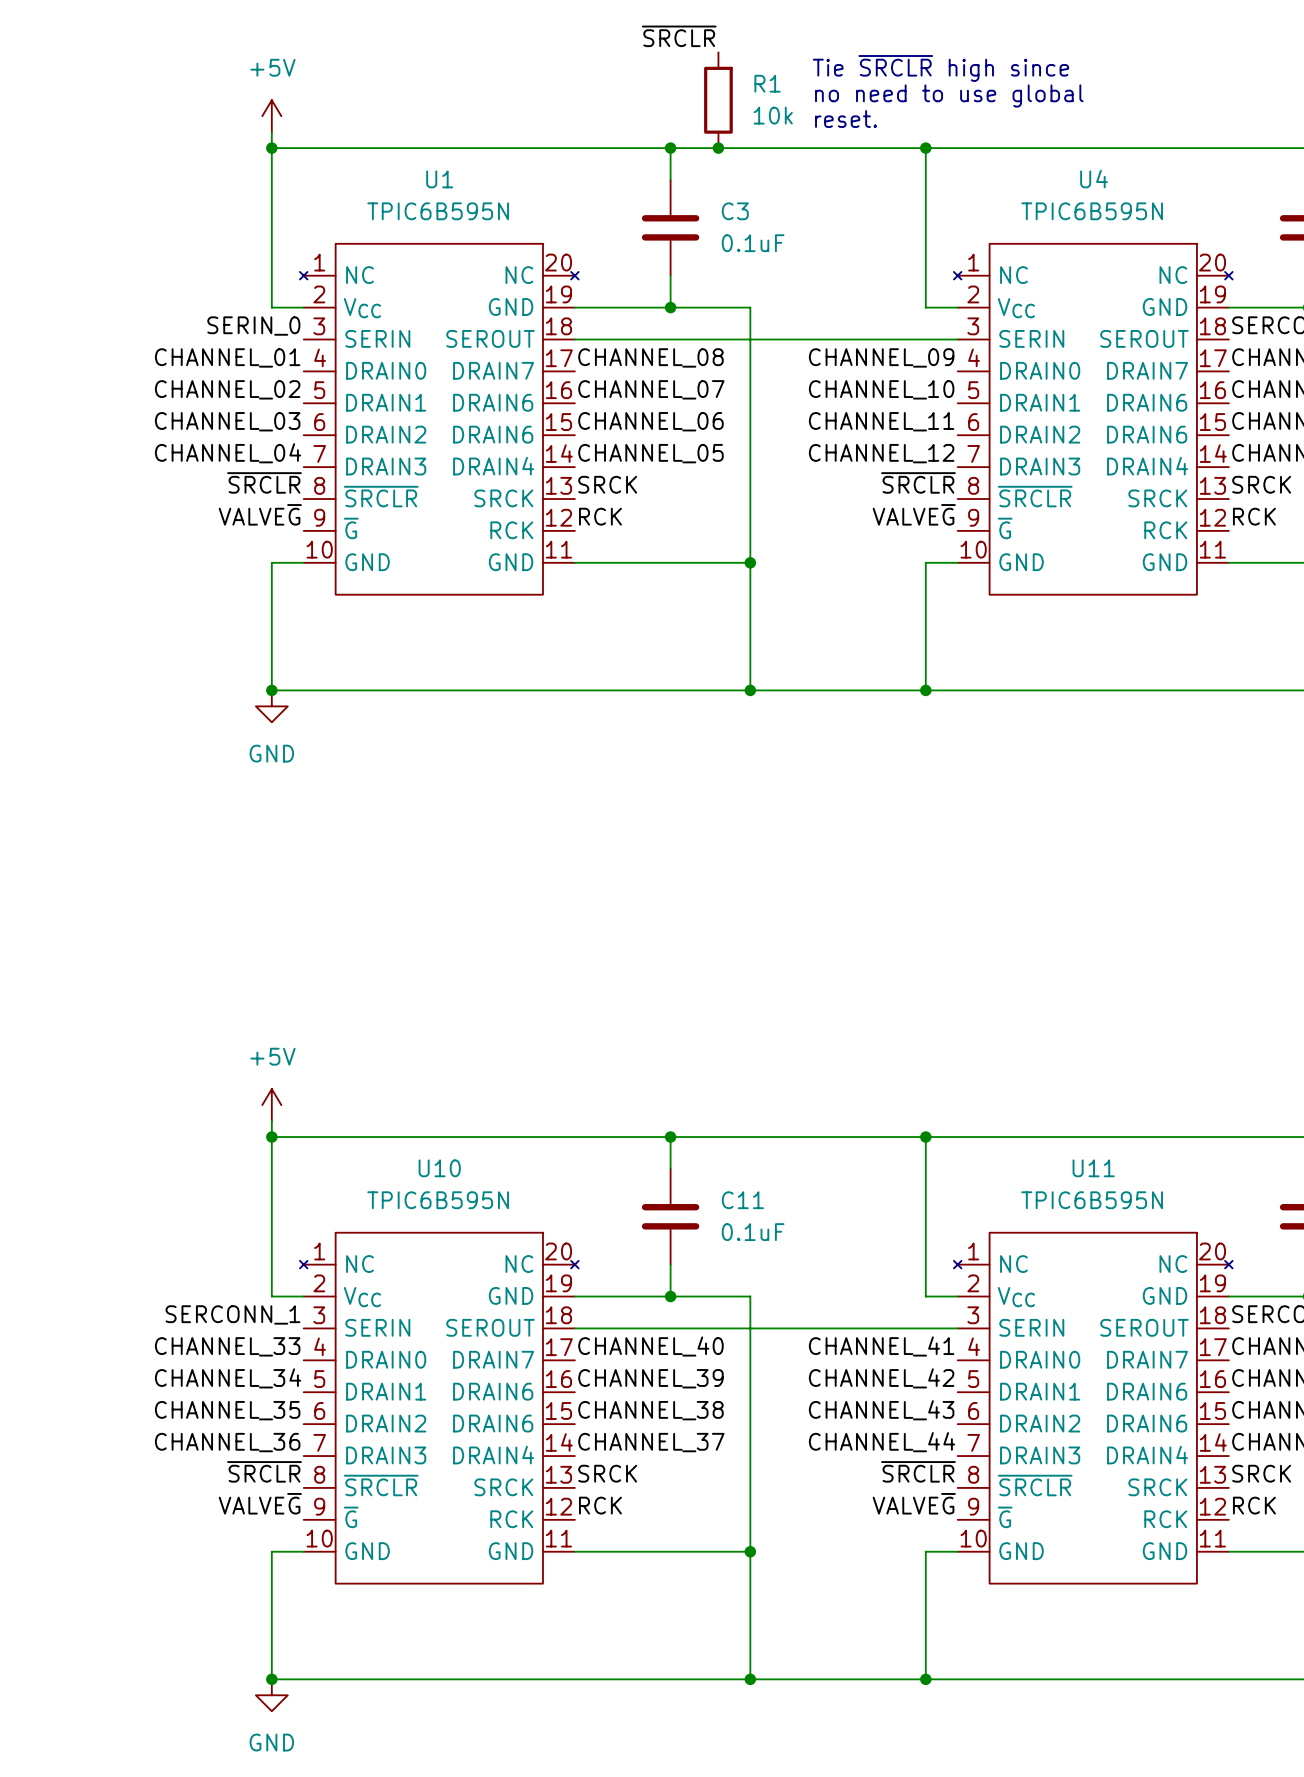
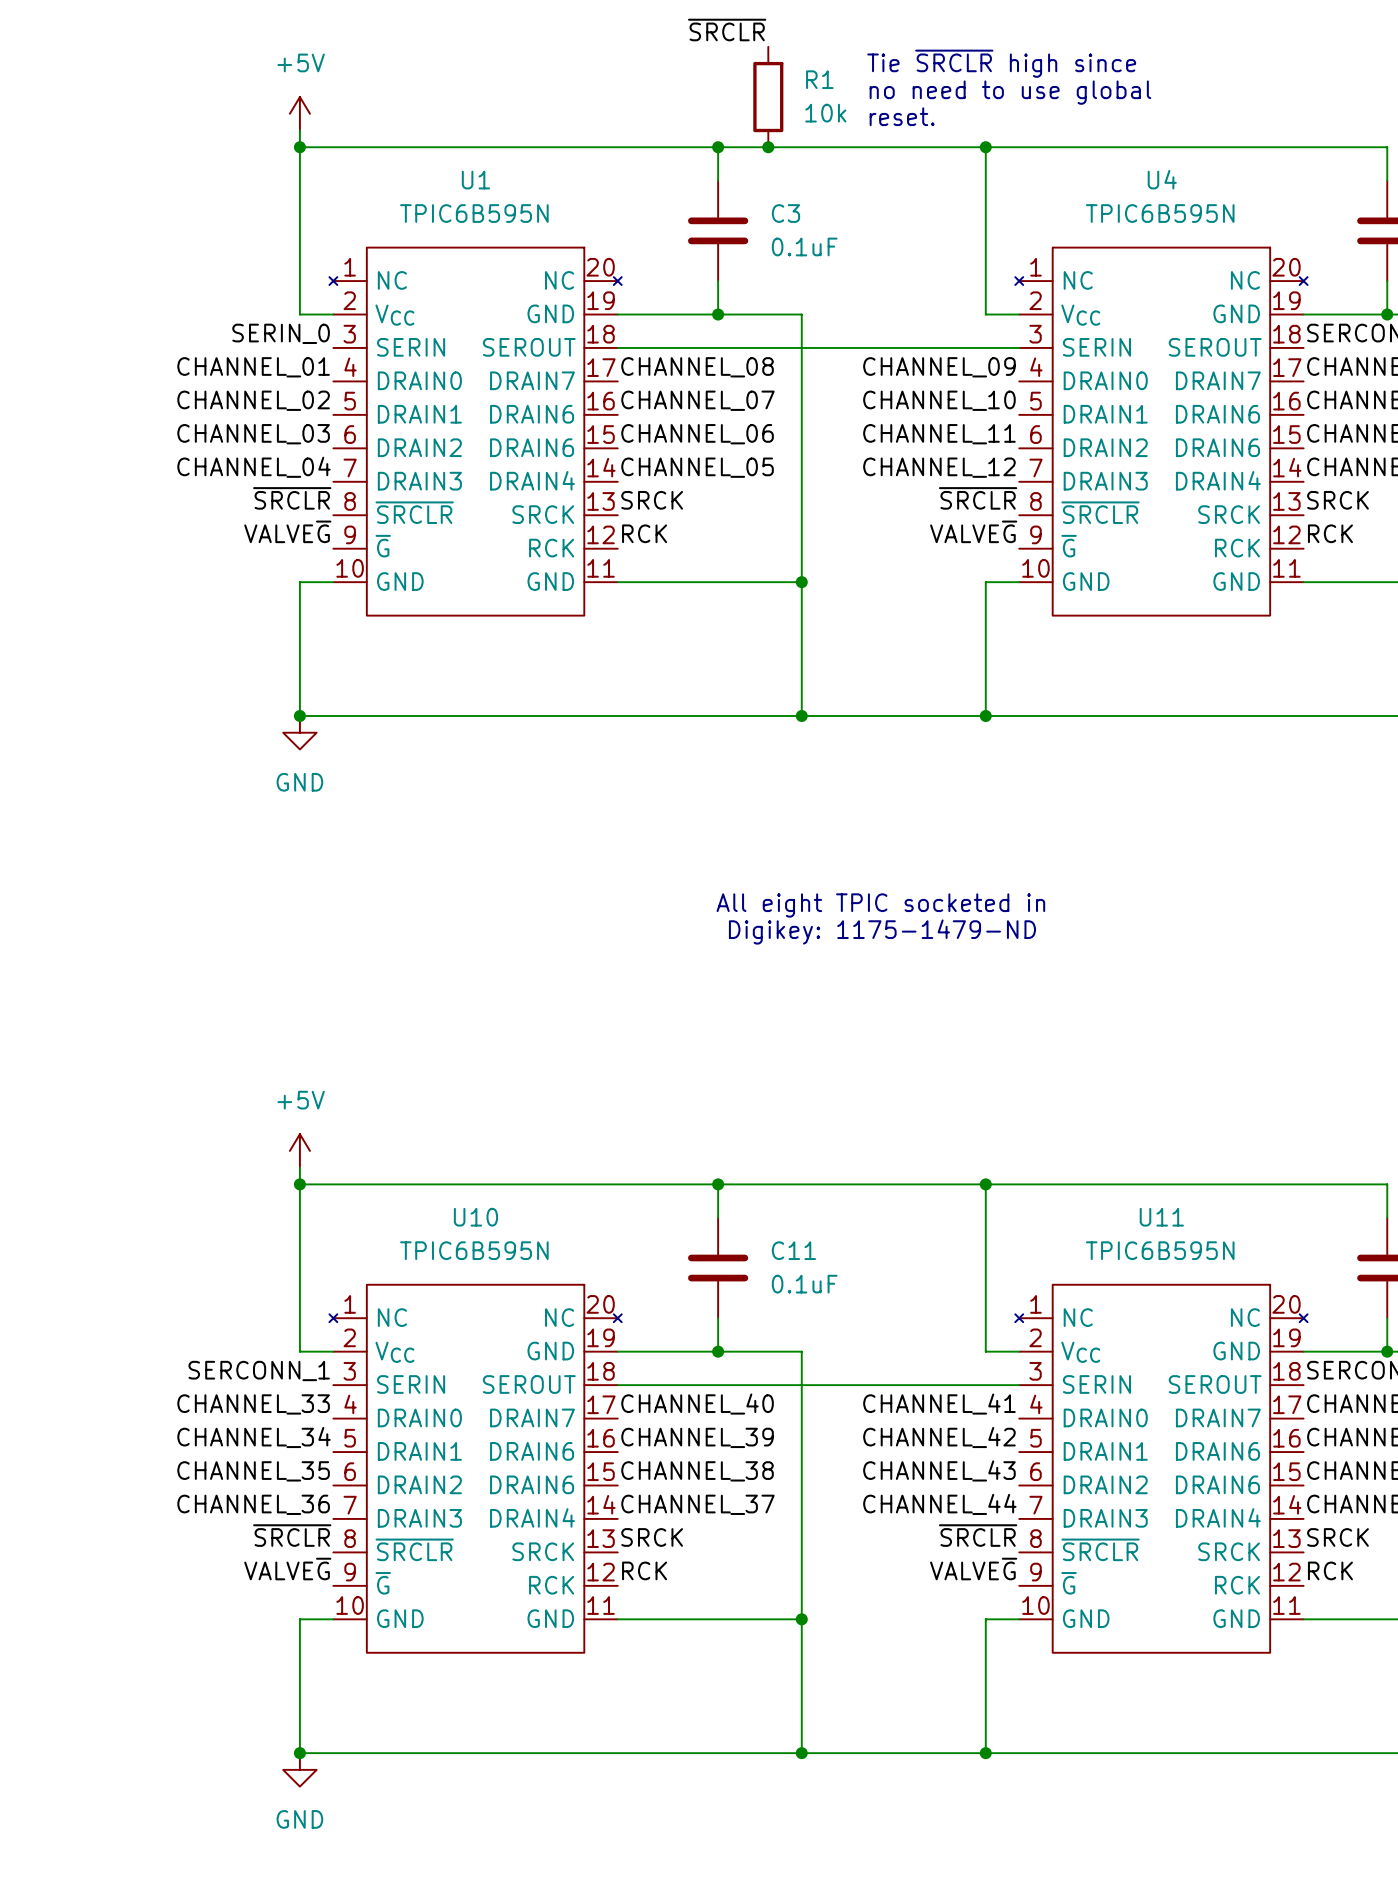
text: none -> All eight TPIC socketed in (880, 905)
text: none -> Digikey: 1175-1479-ND (882, 932)

